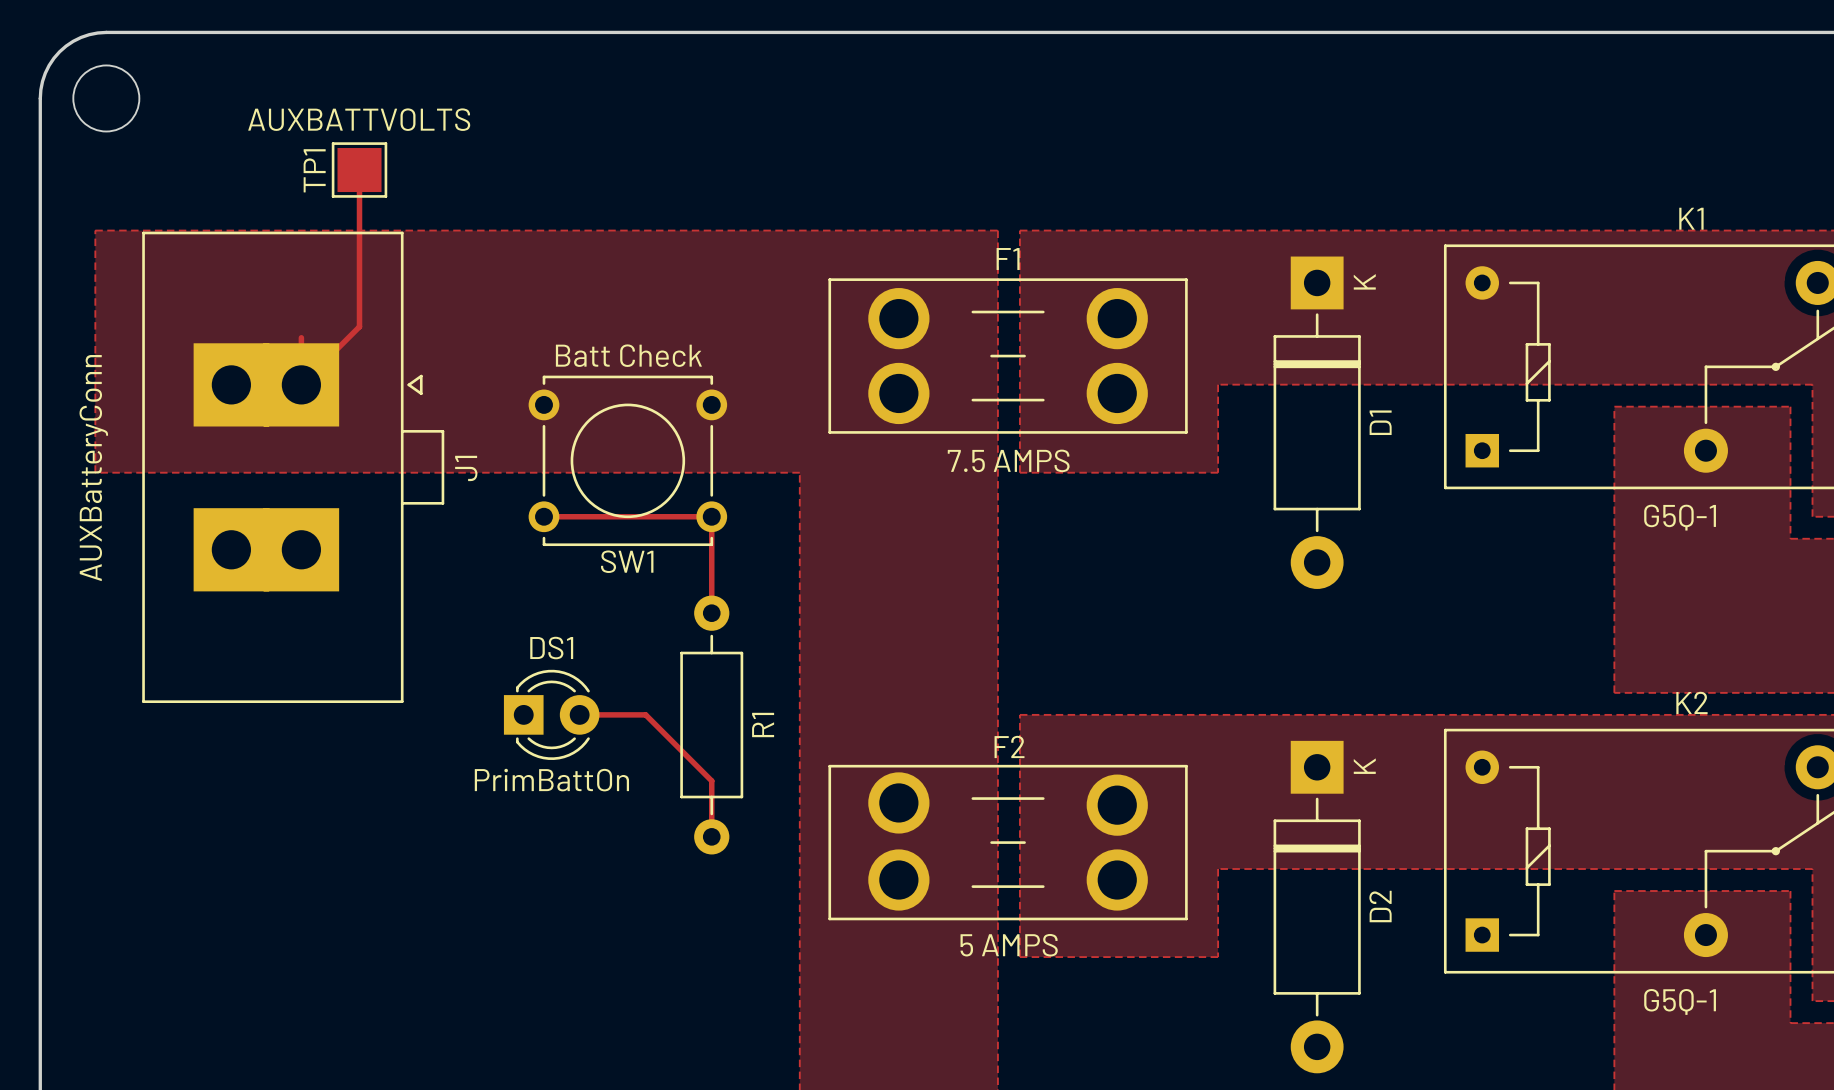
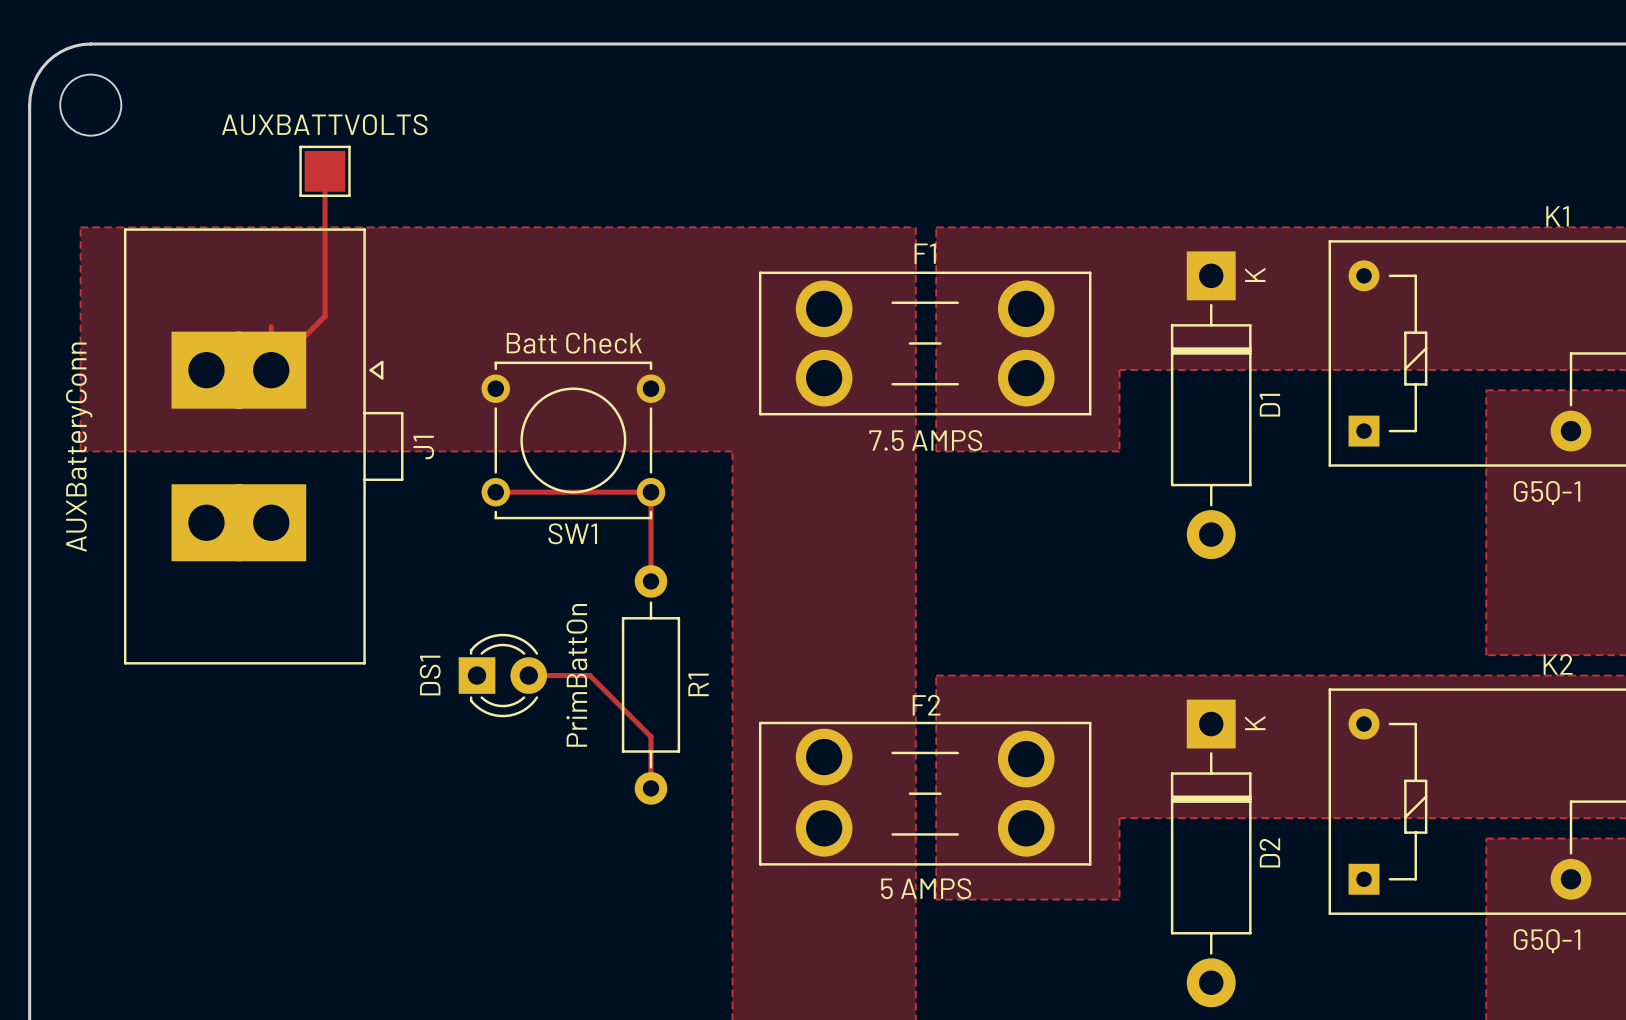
TP1 name: TP1 (314, 170) -> none
DS1 name rotation: 0° (551, 648) -> 90° counterclockwise (430, 675)
DS1 name position: DS1 (551, 648) -> DS1 (430, 675)
DS1 value rotation: 0° (551, 780) -> 90° counterclockwise (576, 675)

